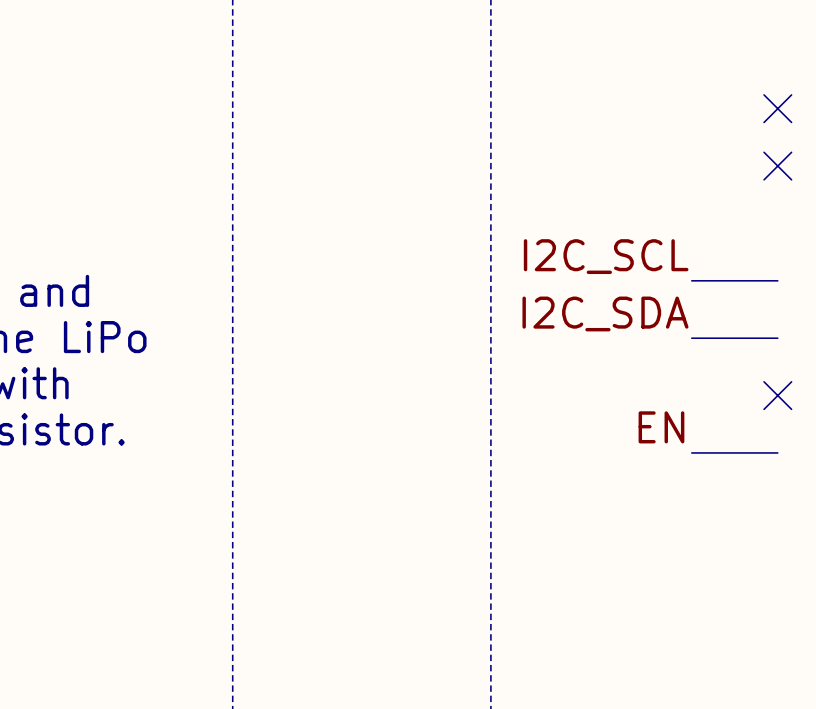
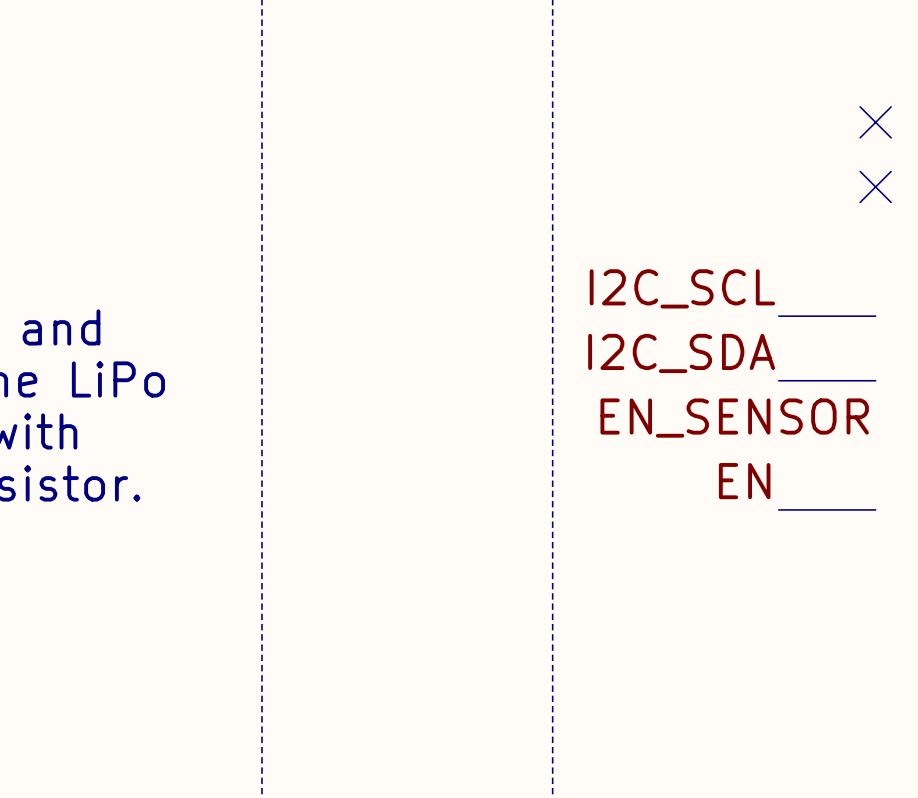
label: none -> EN_SENSOR (734, 418)
no-connect mark: (777, 395) -> none

